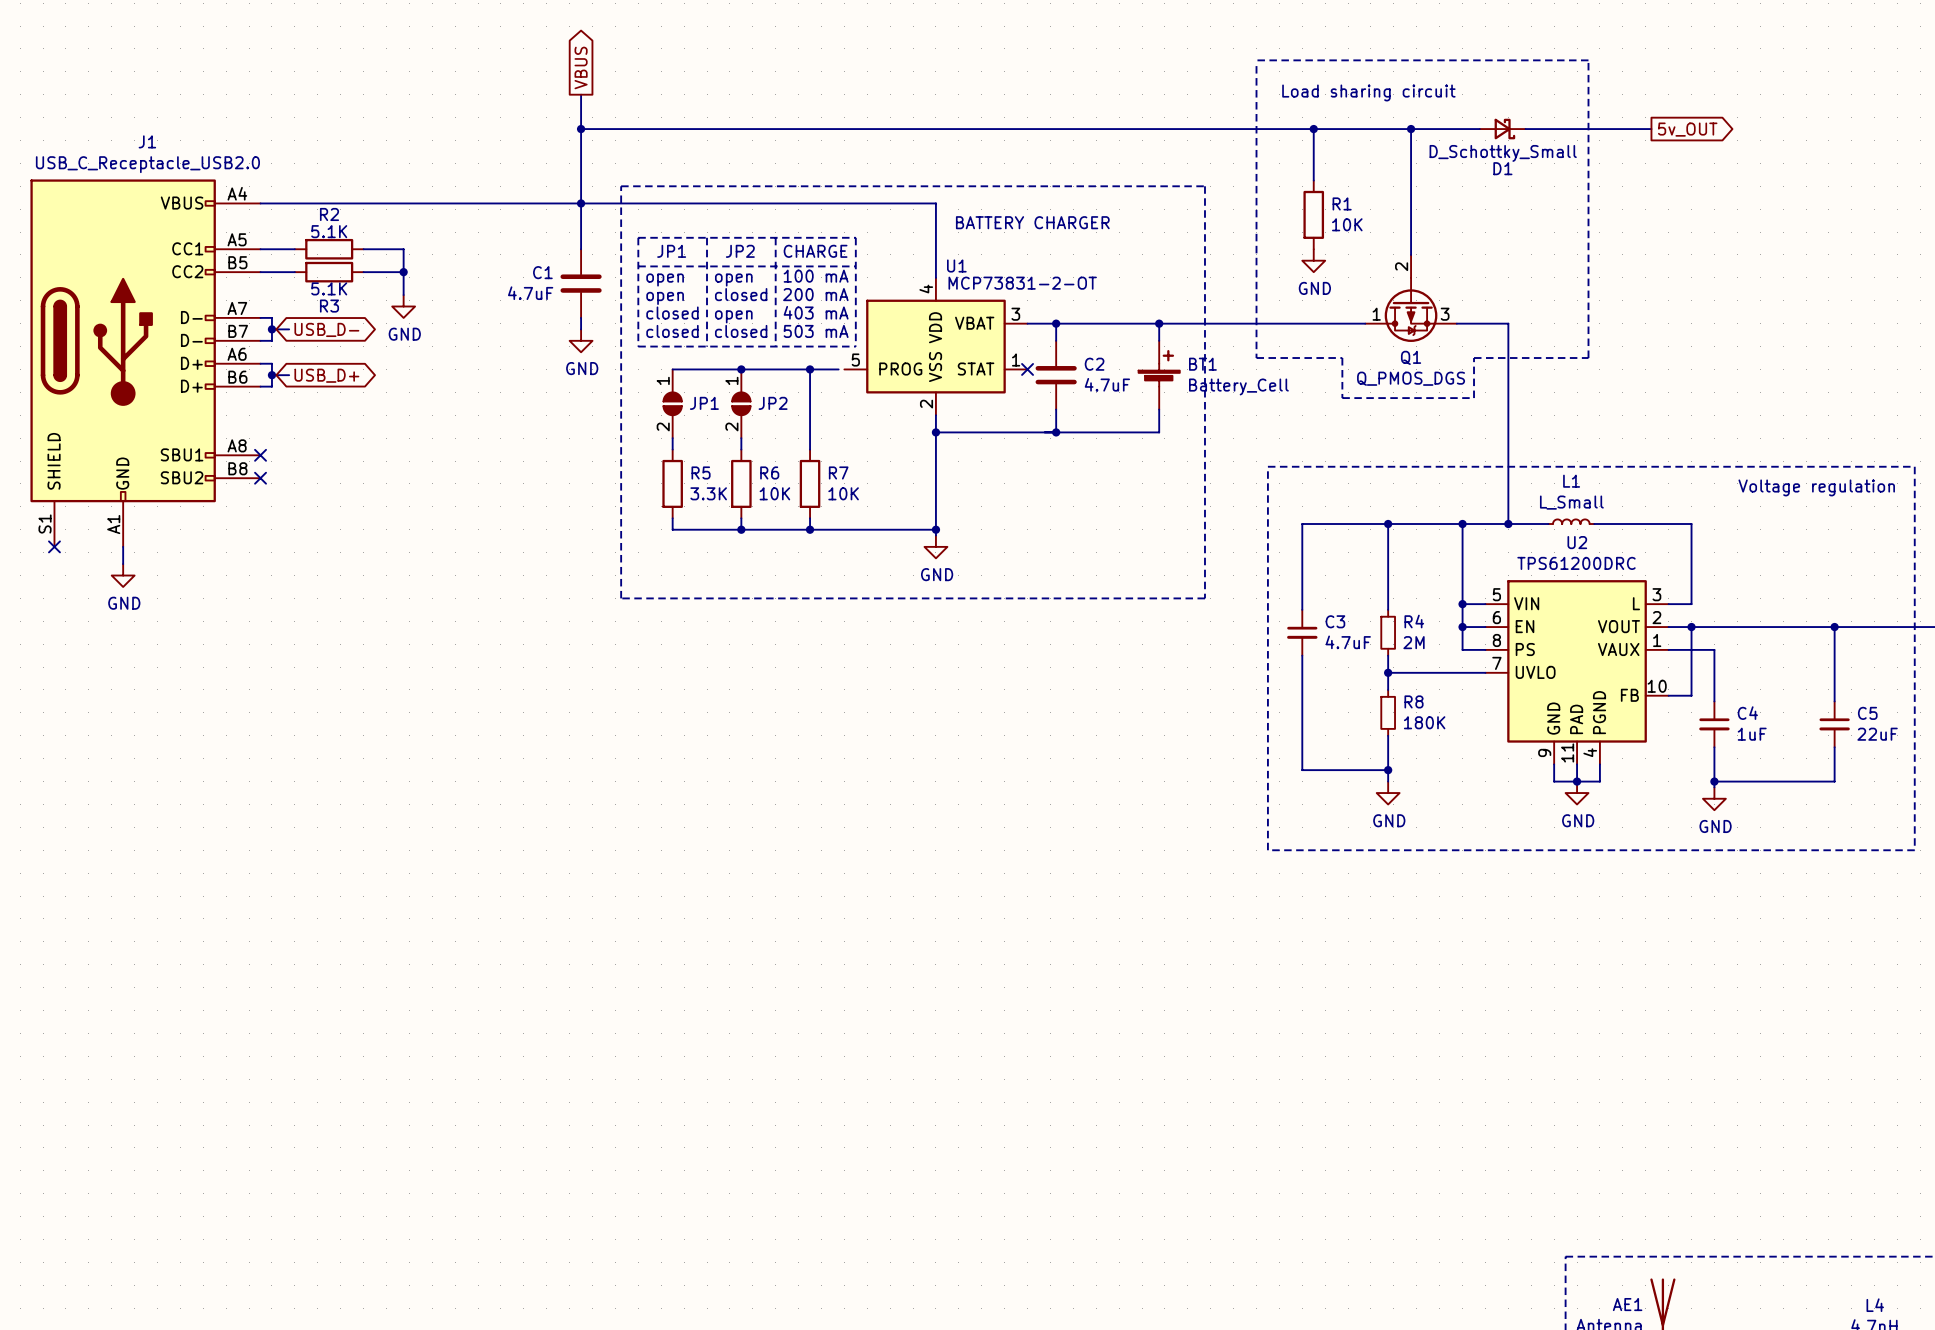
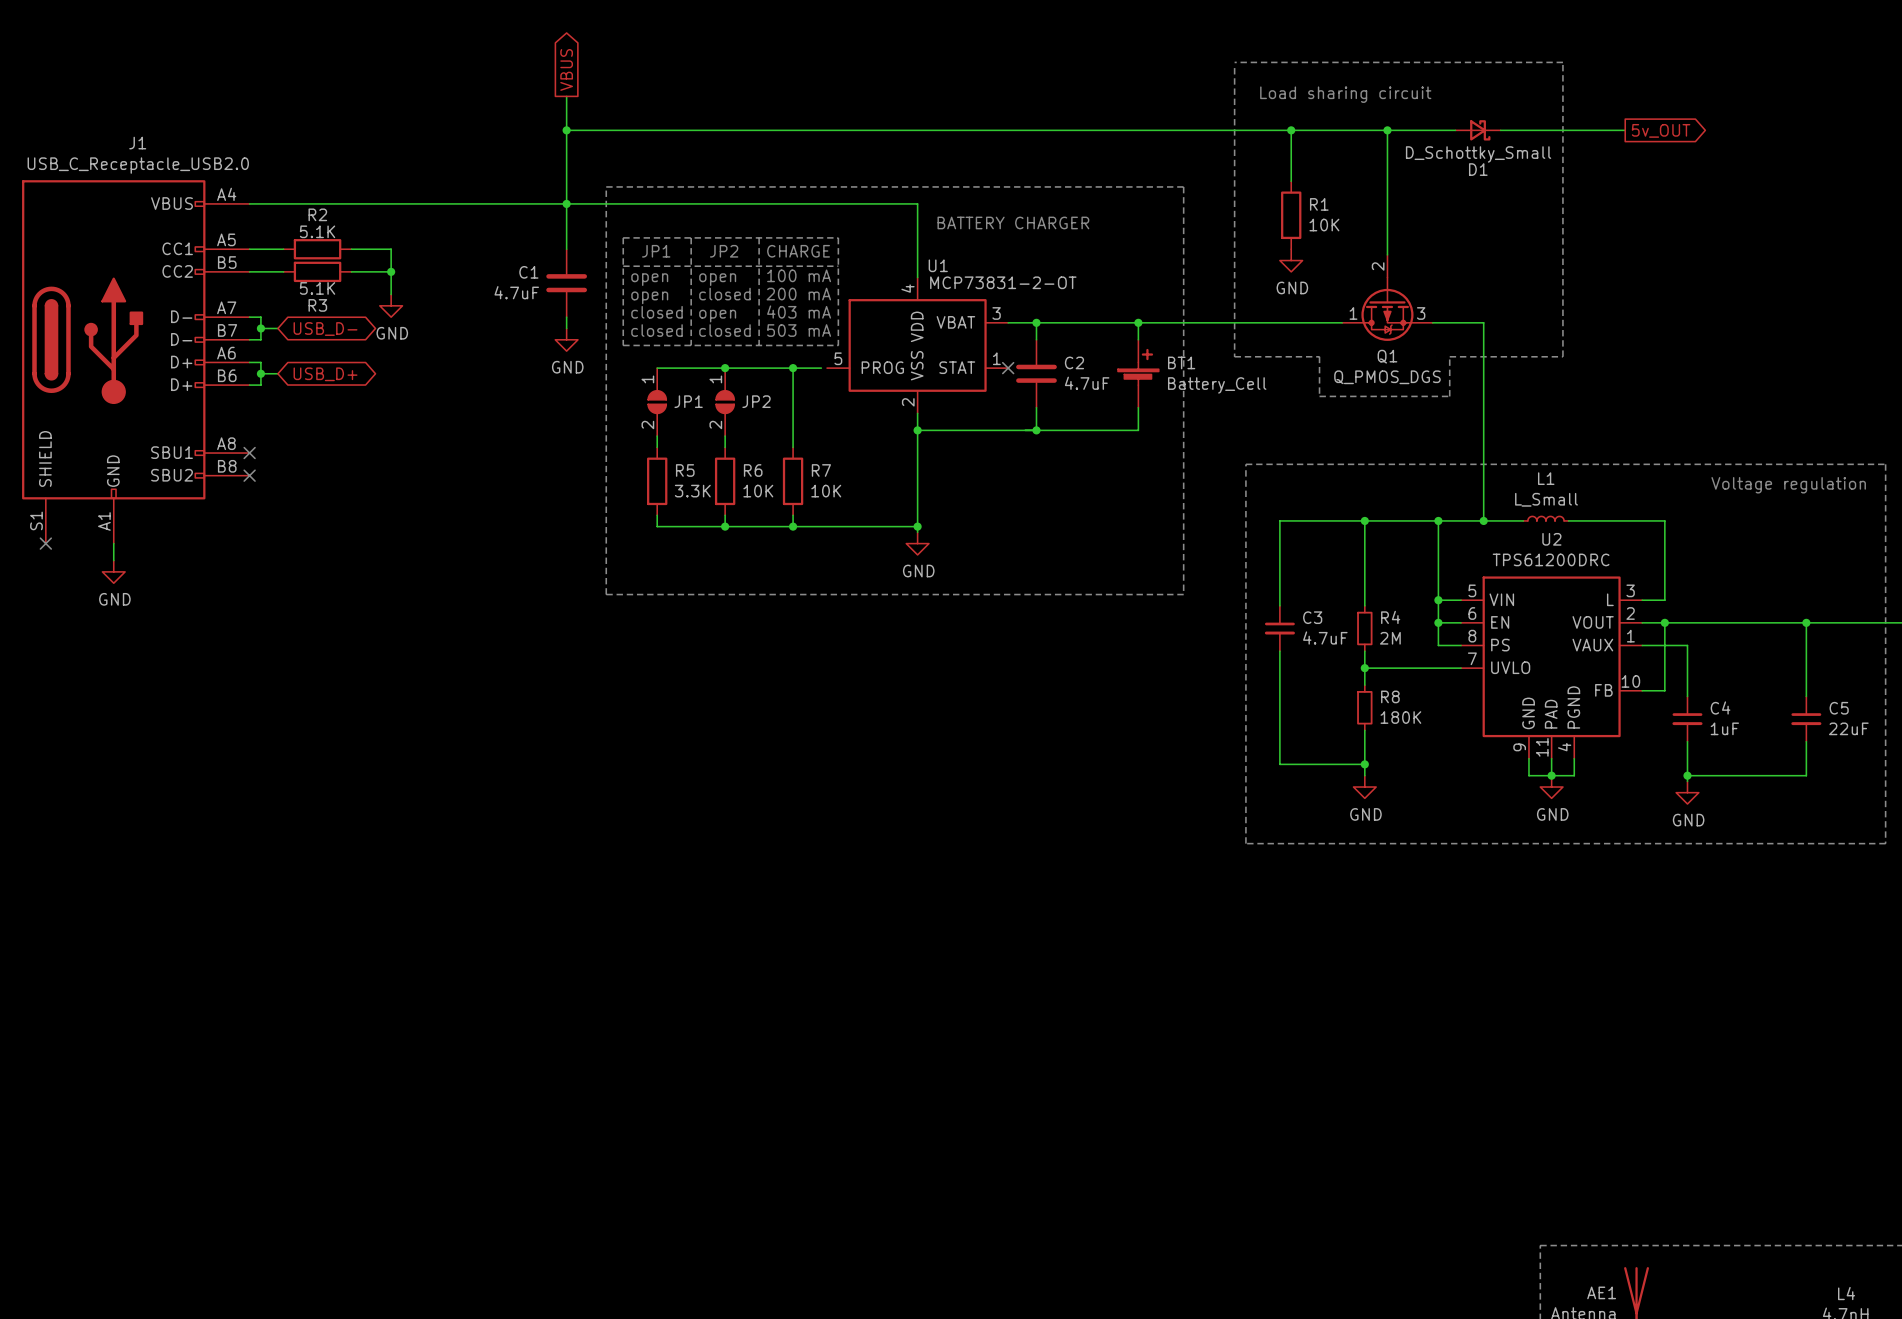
global label rotation: 0° (326, 329) -> 180° (325, 329)
global label rotation: 0° (326, 375) -> 180° (325, 374)

